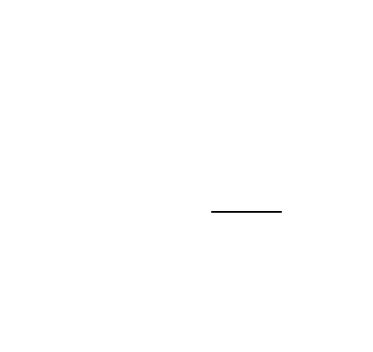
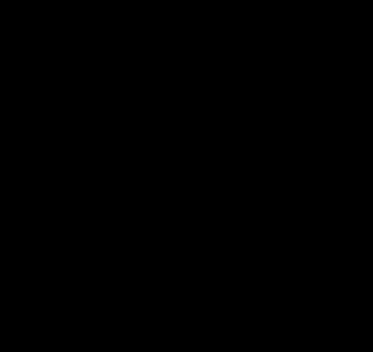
wire: (211, 211) (281, 211) -> none

